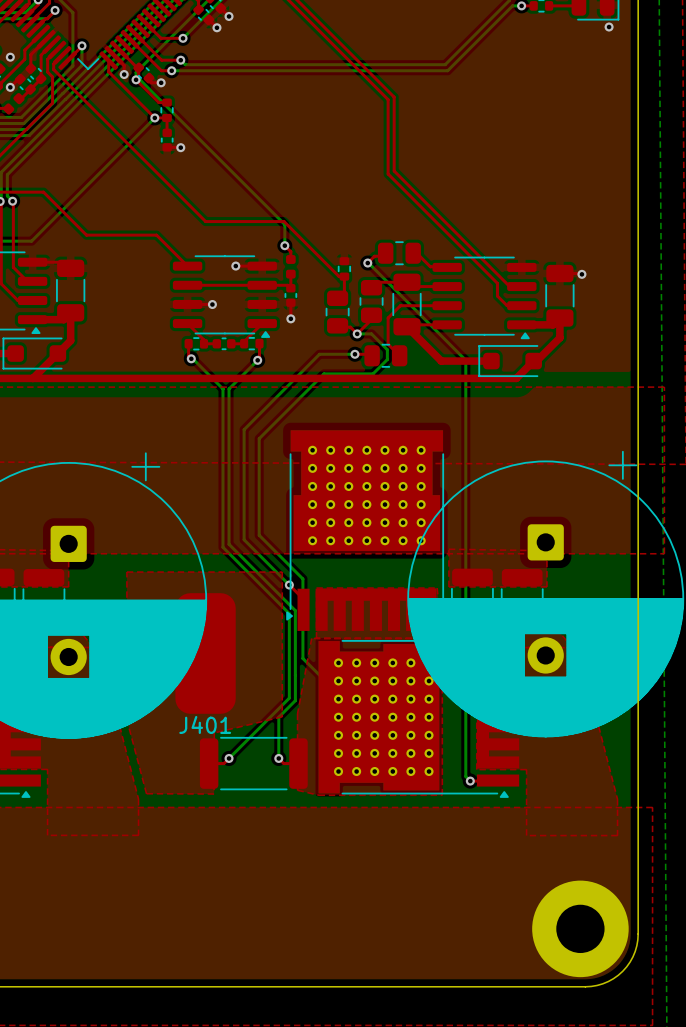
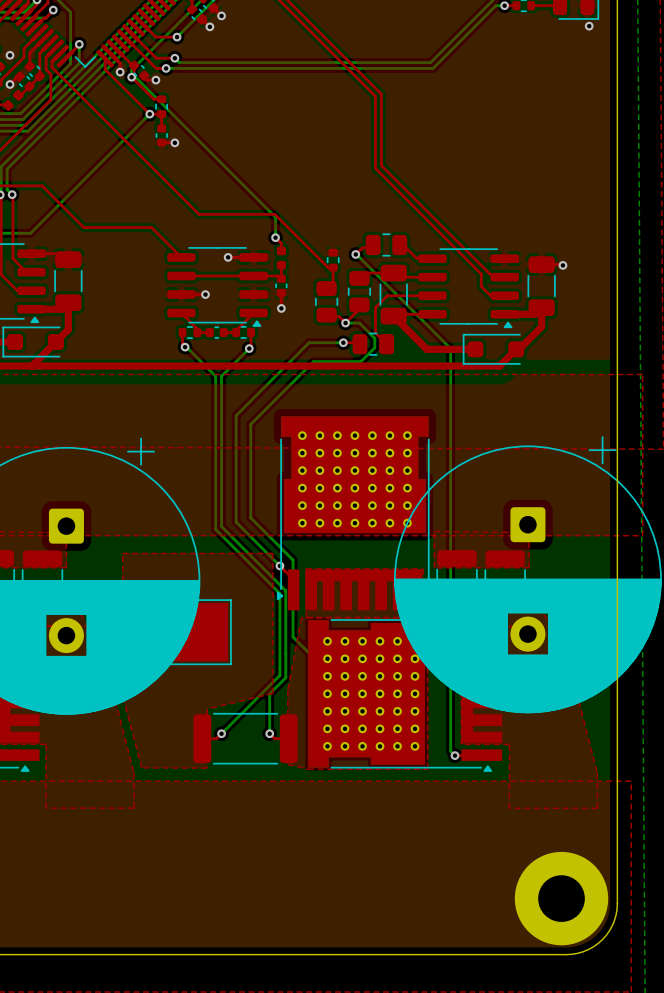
J401: (205, 653) -> none
part: none -> (198, 632)

